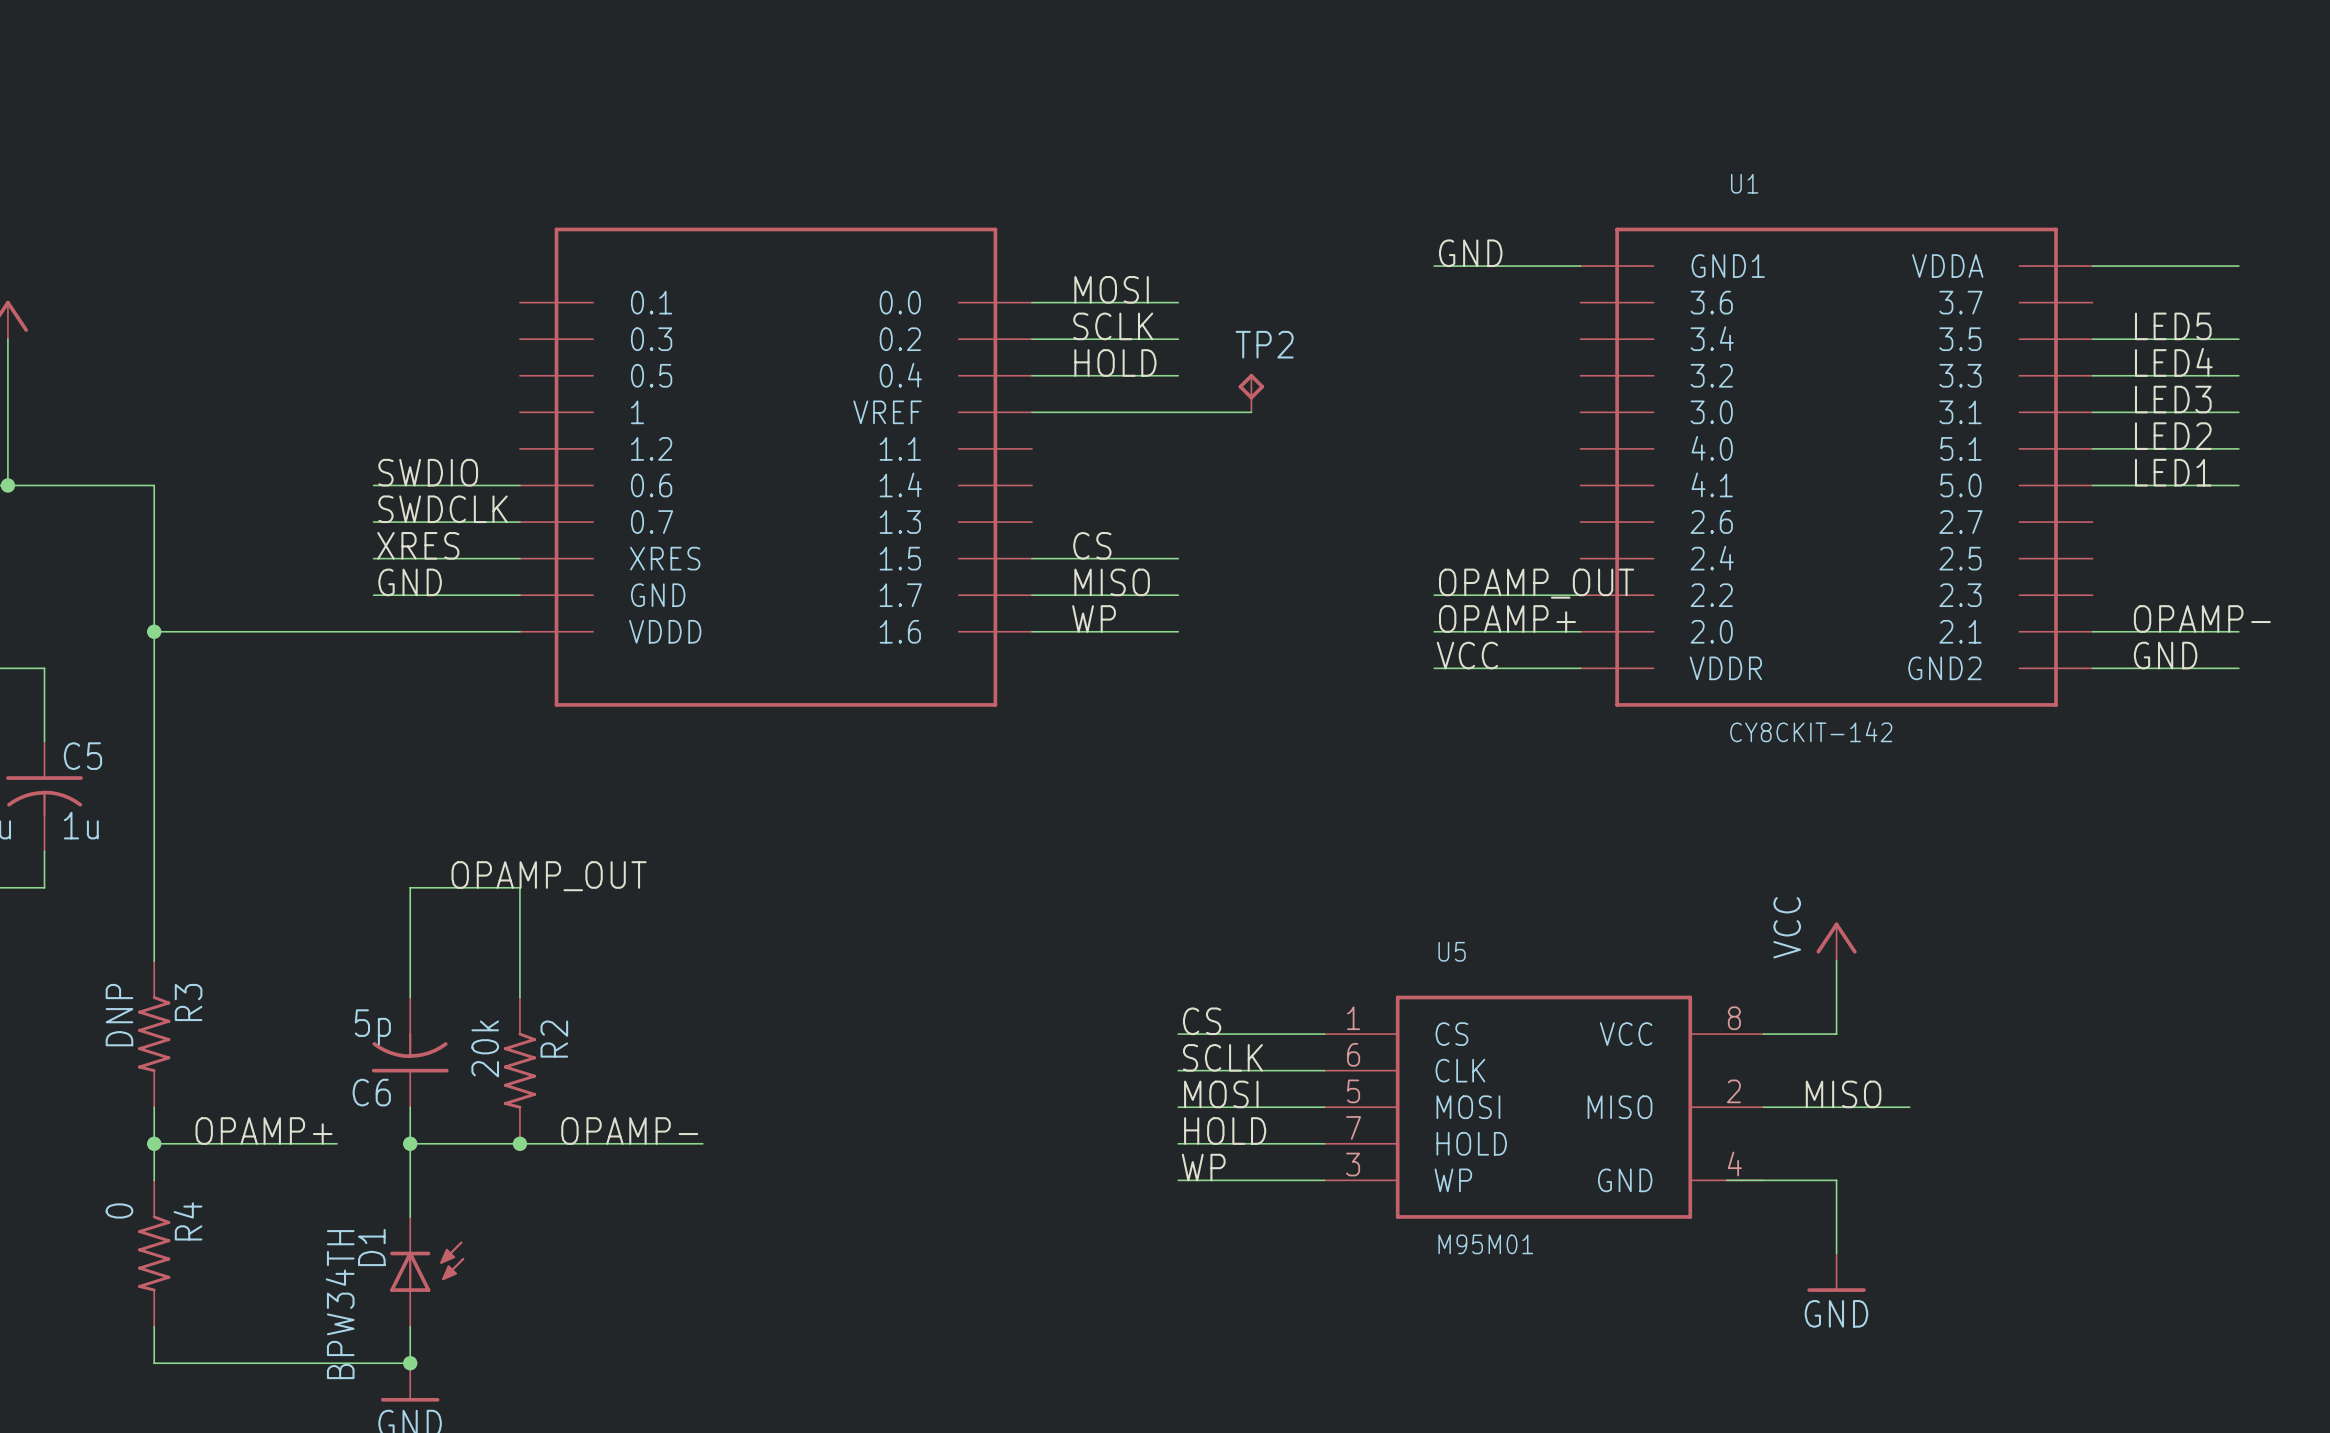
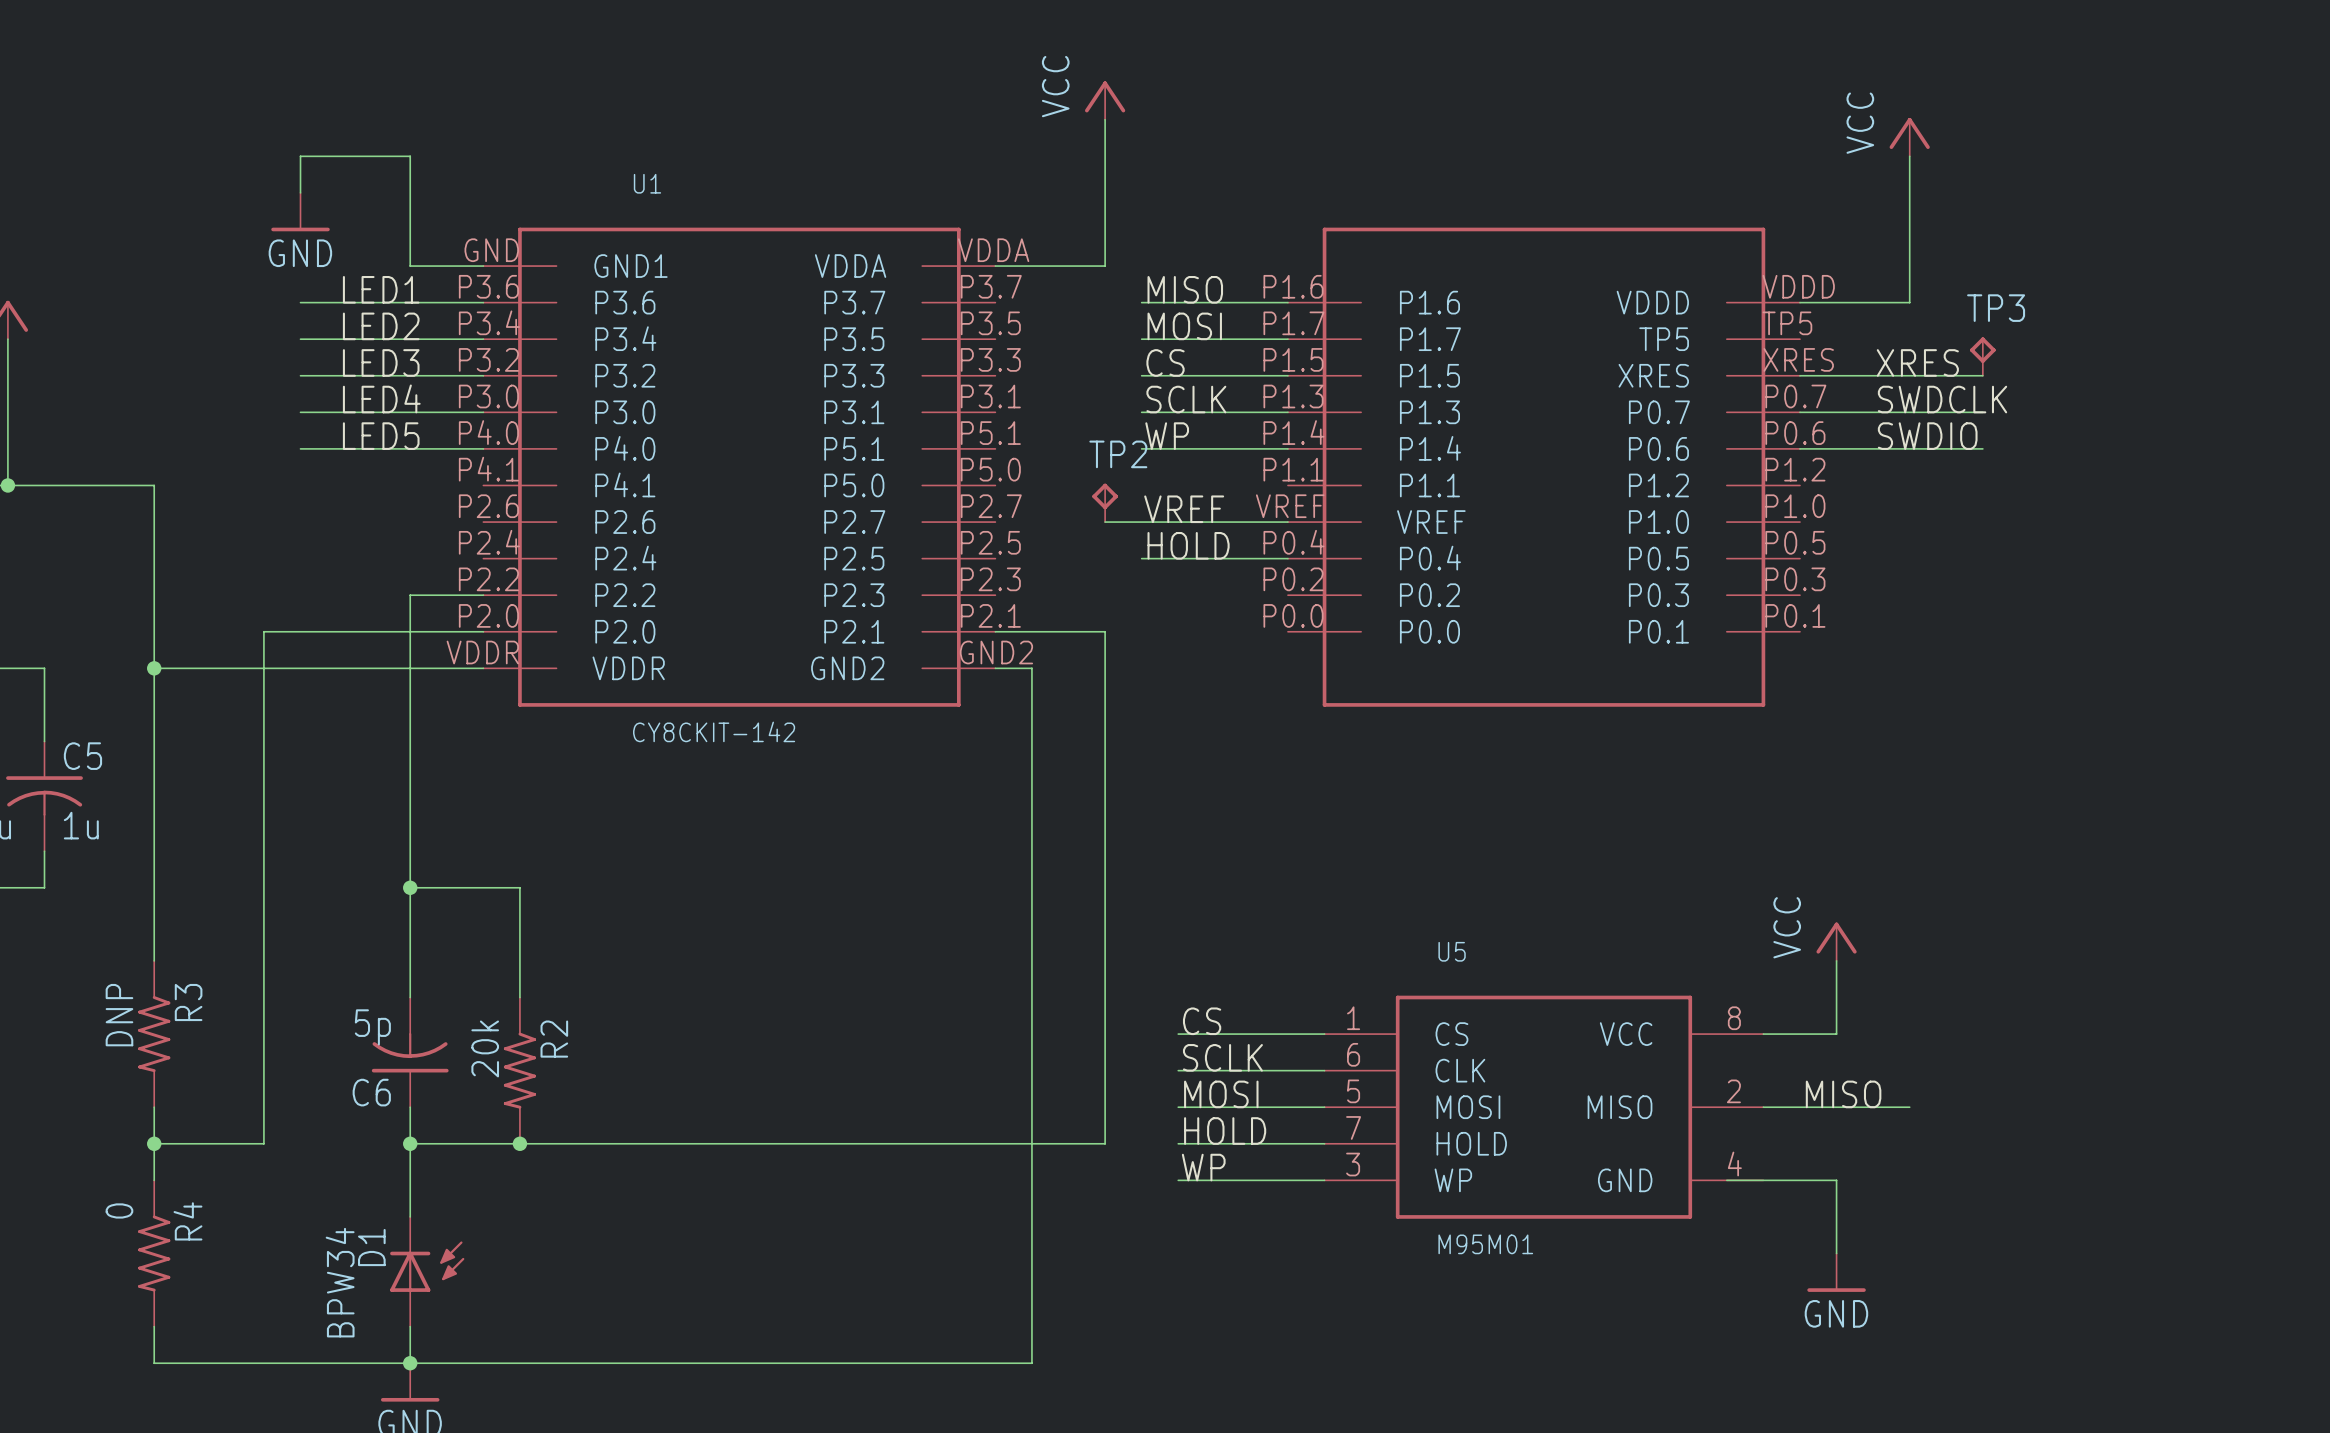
power symbol: none -> VCC (1105, 100)
wire: none -> (1105, 119) (1105, 266) (995, 266)
power symbol: none -> VCC (1909, 137)
wire: none -> (1909, 156) (1909, 302) (1799, 302)
U1 name position: U1 (1744, 183) -> U1 (647, 183)
wire: none -> (300, 192) (300, 156) (410, 156) (410, 266) (483, 266)
power symbol: none -> GND (300, 212)
U1 symbol: [519, 227, 2093, 707] -> [483, 227, 1800, 707]
label: GND (1470, 253) -> none
wire: (1434, 266) (1580, 266) -> none
wire: (2092, 266) (2238, 266) -> none
label: none -> LED1 (381, 289)
label position: MOSI (1111, 289) -> MOSI (1184, 326)
wire: none -> (300, 302) (483, 302)
wire: (1031, 302) (1141, 302) -> (1178, 302) (1287, 302)
label: none -> LED2 (381, 326)
label position: SCLK (1113, 326) -> SCLK (1186, 399)
label: LED5 (2173, 326) -> none
wire: none -> (300, 339) (483, 339)
wire: (1031, 339) (1141, 339) -> (1178, 339) (1287, 339)
wire: (2092, 339) (2238, 339) -> none
TP3: none -> (1982, 356)
label: none -> LED3 (381, 362)
label position: HOLD (1115, 362) -> HOLD (1188, 545)
label: none -> XRES (1917, 362)
label: LED4 (2173, 362) -> none
wire: none -> (300, 375) (483, 375)
wire: (1031, 375) (1141, 375) -> (1178, 375) (1287, 375)
wire: none -> (1799, 375) (1982, 375)
wire: (2092, 375) (2238, 375) -> none
TP2 position: (1251, 393) -> (1105, 502)
label: none -> LED4 (381, 398)
label: none -> SWDCLK (1942, 399)
label: LED3 (2173, 399) -> none
wire: none -> (300, 412) (483, 412)
wire: (1031, 412) (1141, 412) -> none
wire: none -> (1251, 412) (1287, 412)
wire: none -> (1799, 412) (1982, 412)
wire: (2092, 412) (2238, 412) -> none
label: none -> LED5 (381, 436)
label: none -> SWDIO (1927, 436)
label: LED2 (2173, 436) -> none
wire: none -> (300, 448) (483, 448)
wire: none -> (1799, 448) (1982, 448)
wire: (2092, 448) (2238, 448) -> none
label: SWDIO (428, 472) -> none
label: LED1 (2173, 472) -> none
wire: (373, 485) (519, 485) -> none
wire: (2092, 485) (2238, 485) -> none
label: SWDCLK (443, 509) -> none
label: none -> VREF (1184, 509)
wire: (373, 522) (519, 522) -> none
wire: none -> (1105, 522) (1287, 522)
label: XRES (418, 545) -> none
label position: CS (1092, 545) -> CS (1165, 362)
wire: (373, 558) (519, 558) -> none
wire: (1031, 558) (1141, 558) -> (1178, 558) (1287, 558)
label: GND (410, 582) -> none
label position: MISO (1112, 582) -> MISO (1185, 289)
label: OPAMP_OUT (1536, 583) -> none
wire: (373, 595) (410, 595) -> (410, 887) (410, 595)
wire: (1031, 595) (1178, 595) -> (1141, 448) (1287, 448)
wire: (1434, 595) (1580, 595) -> none
label position: WP (1094, 618) -> WP (1167, 436)
label: OPAMP+ (1507, 618) -> none
label: OPAMP- (2202, 618) -> none
wire: (154, 631) (263, 631) -> none
junction position: (154, 631) -> (154, 668)
wire: (1105, 631) (1178, 631) -> (1105, 631) (1105, 1143) (702, 1143)
wire: (1434, 631) (1580, 631) -> none
wire: (2092, 631) (2238, 631) -> none
label: VCC (1467, 655) -> none
label: GND (2165, 655) -> none
wire: none -> (154, 668) (483, 668)
wire: none -> (995, 668) (1031, 668) (1031, 1363) (410, 1363)
wire: (1434, 668) (1580, 668) -> none
wire: (2092, 668) (2238, 668) -> none
U1 value position: CY8CKIT-142 (1811, 731) -> CY8CKIT-142 (714, 731)
label: OPAMP_OUT (549, 876) -> none
junction: none -> (410, 887)
label: OPAMP+ (264, 1130) -> none
label: OPAMP- (629, 1130) -> none
wire: (263, 1143) (337, 1143) -> (263, 1143) (263, 631)
D1 value: BPW34TH (340, 1304) -> BPW34 (340, 1282)

